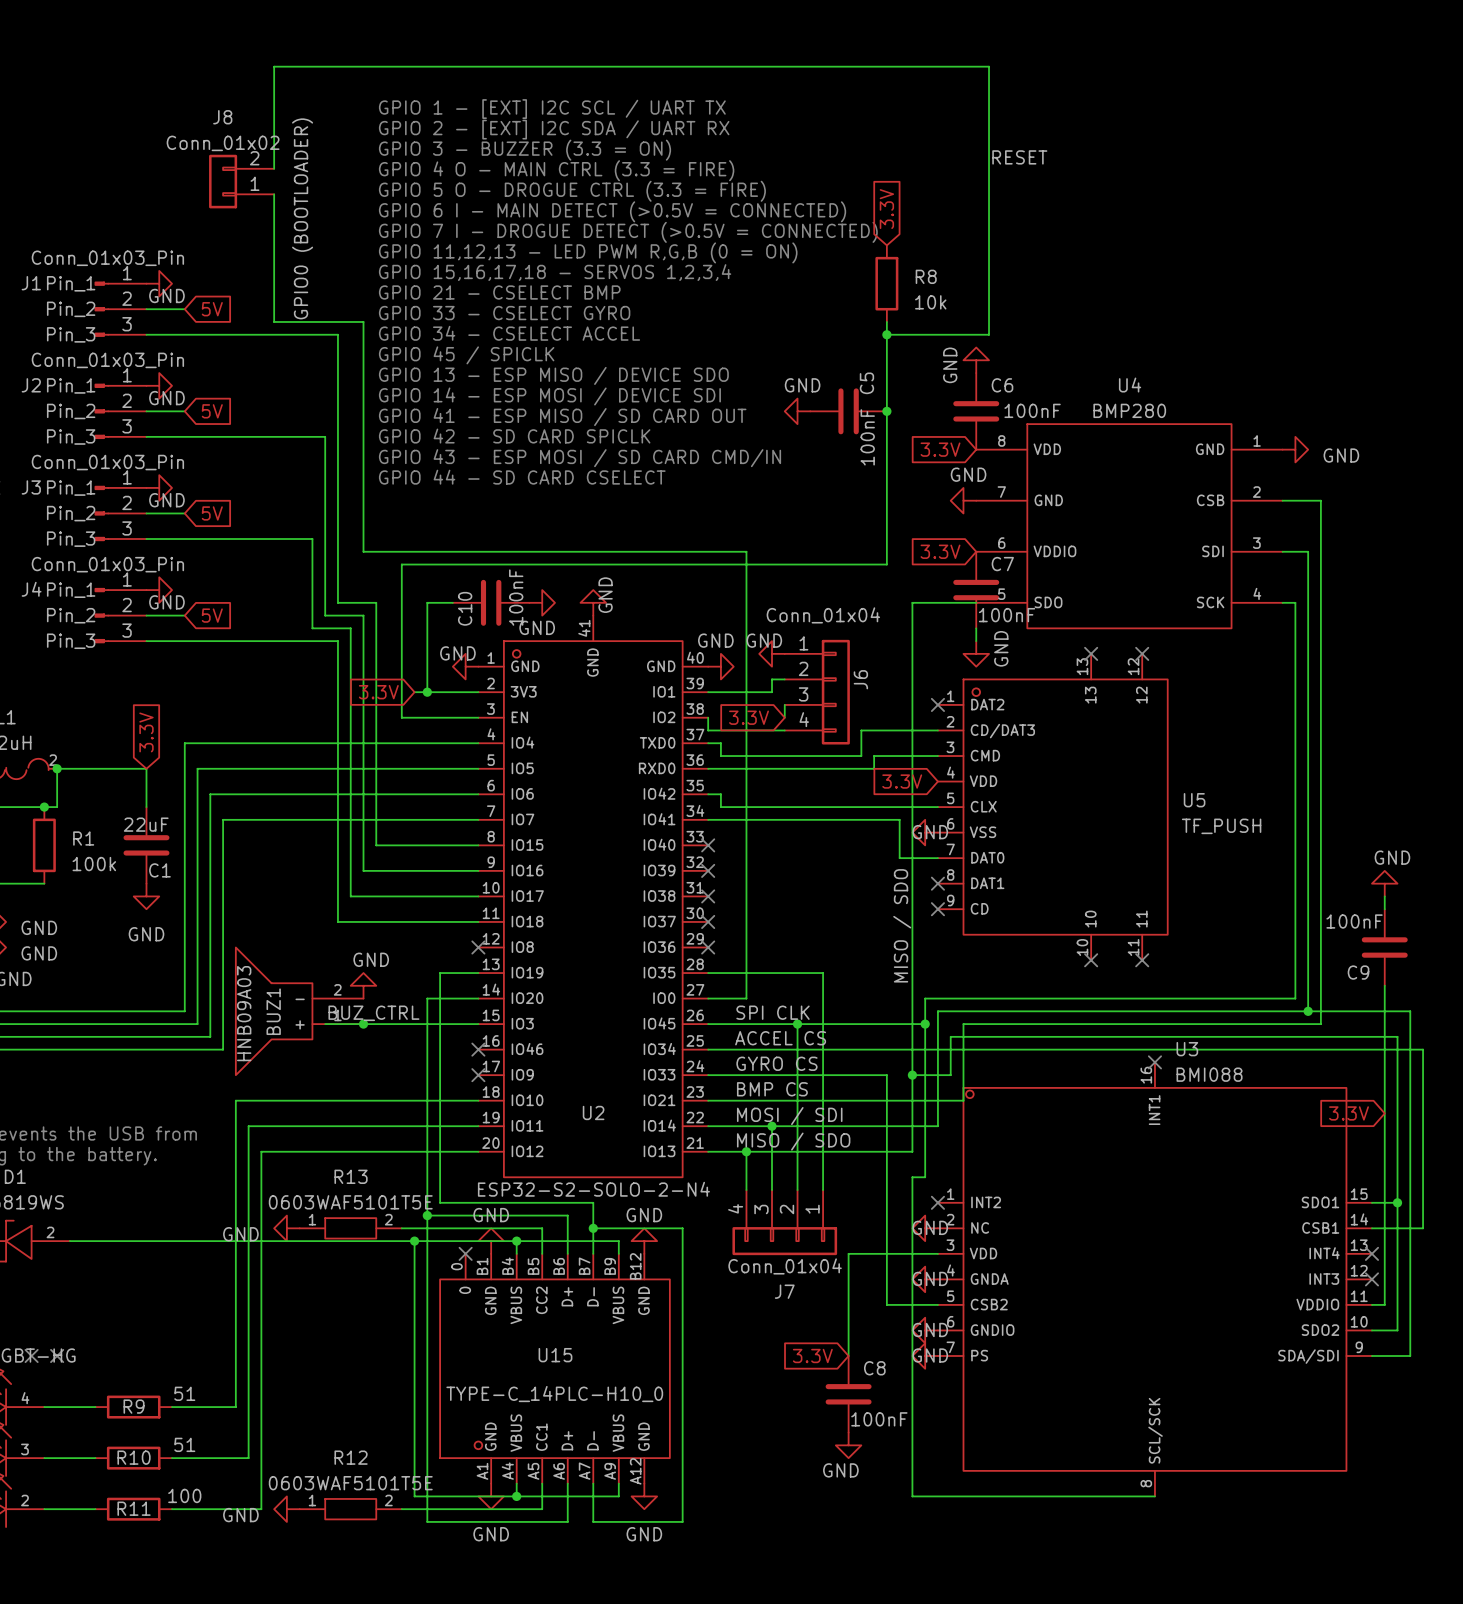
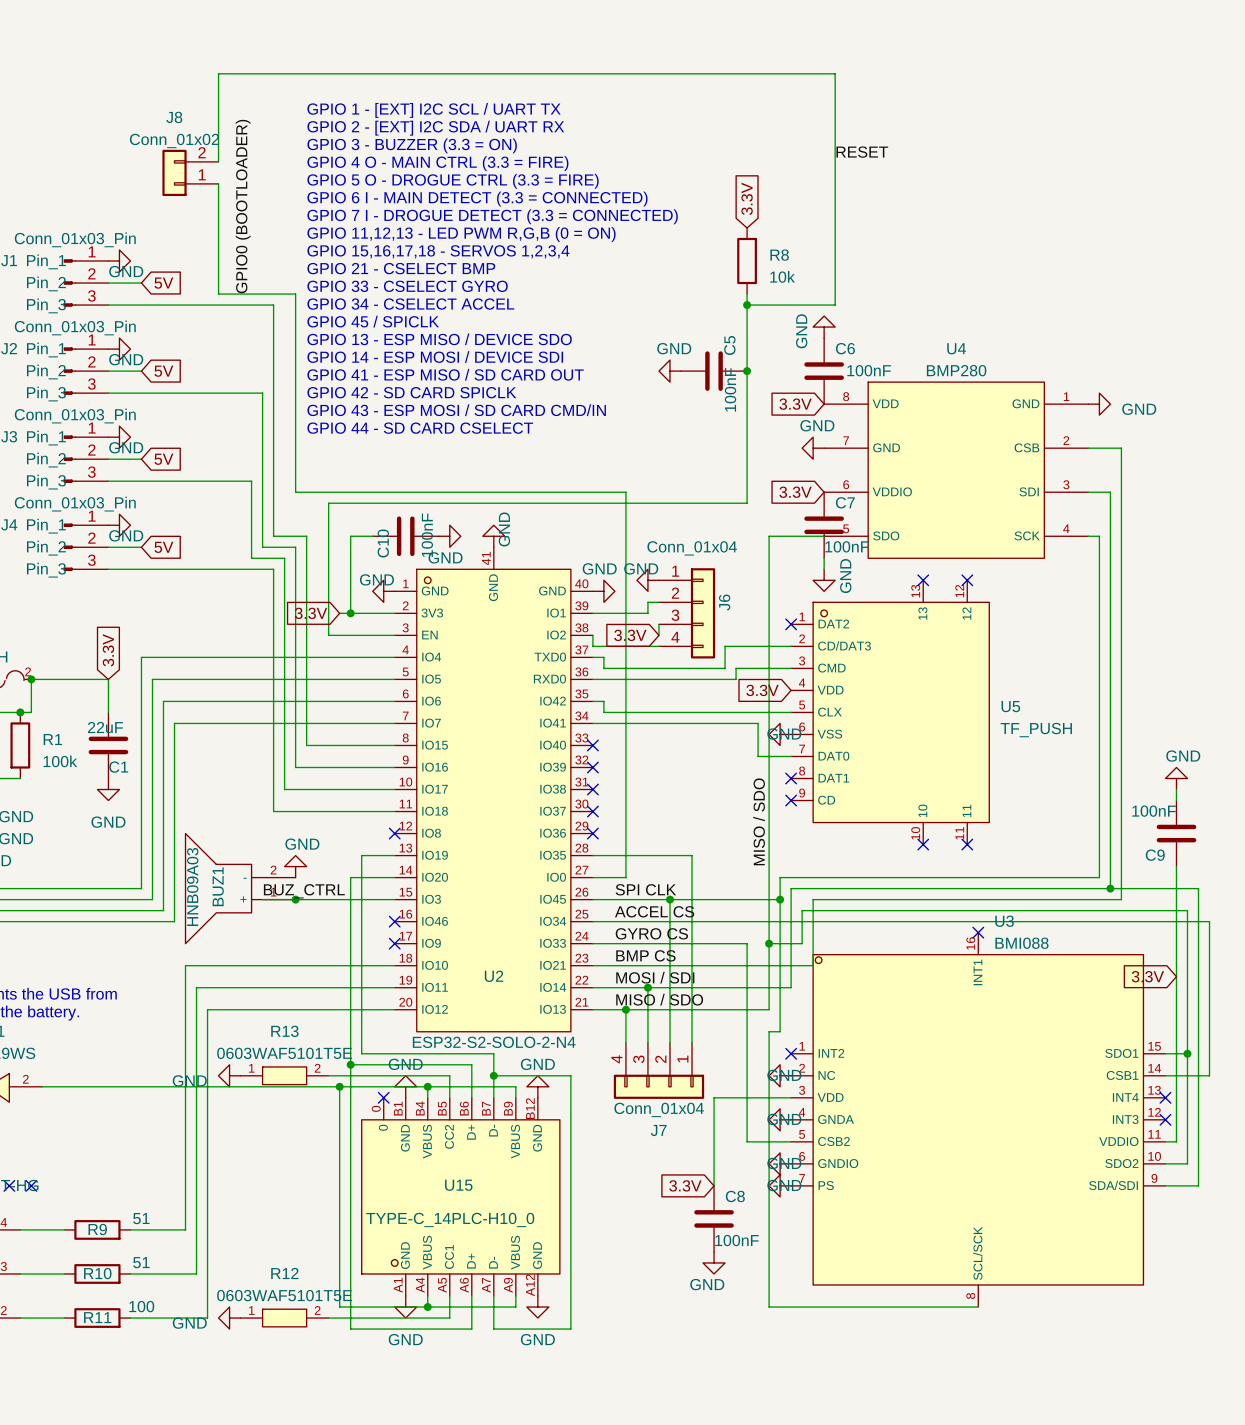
text: GPIO 6 I - MAIN DETECT (>0.5V = CONNECTED) (612, 211) -> GPIO 6 I - MAIN DETECT (3.3 = CONNECTED) (477, 199)
text: GPIO 7 I - DROGUE DETECT (>0.5V = CONNECTED) (628, 232) -> GPIO 7 I - DROGUE DETECT (3.3 = CONNECTED) (492, 216)

